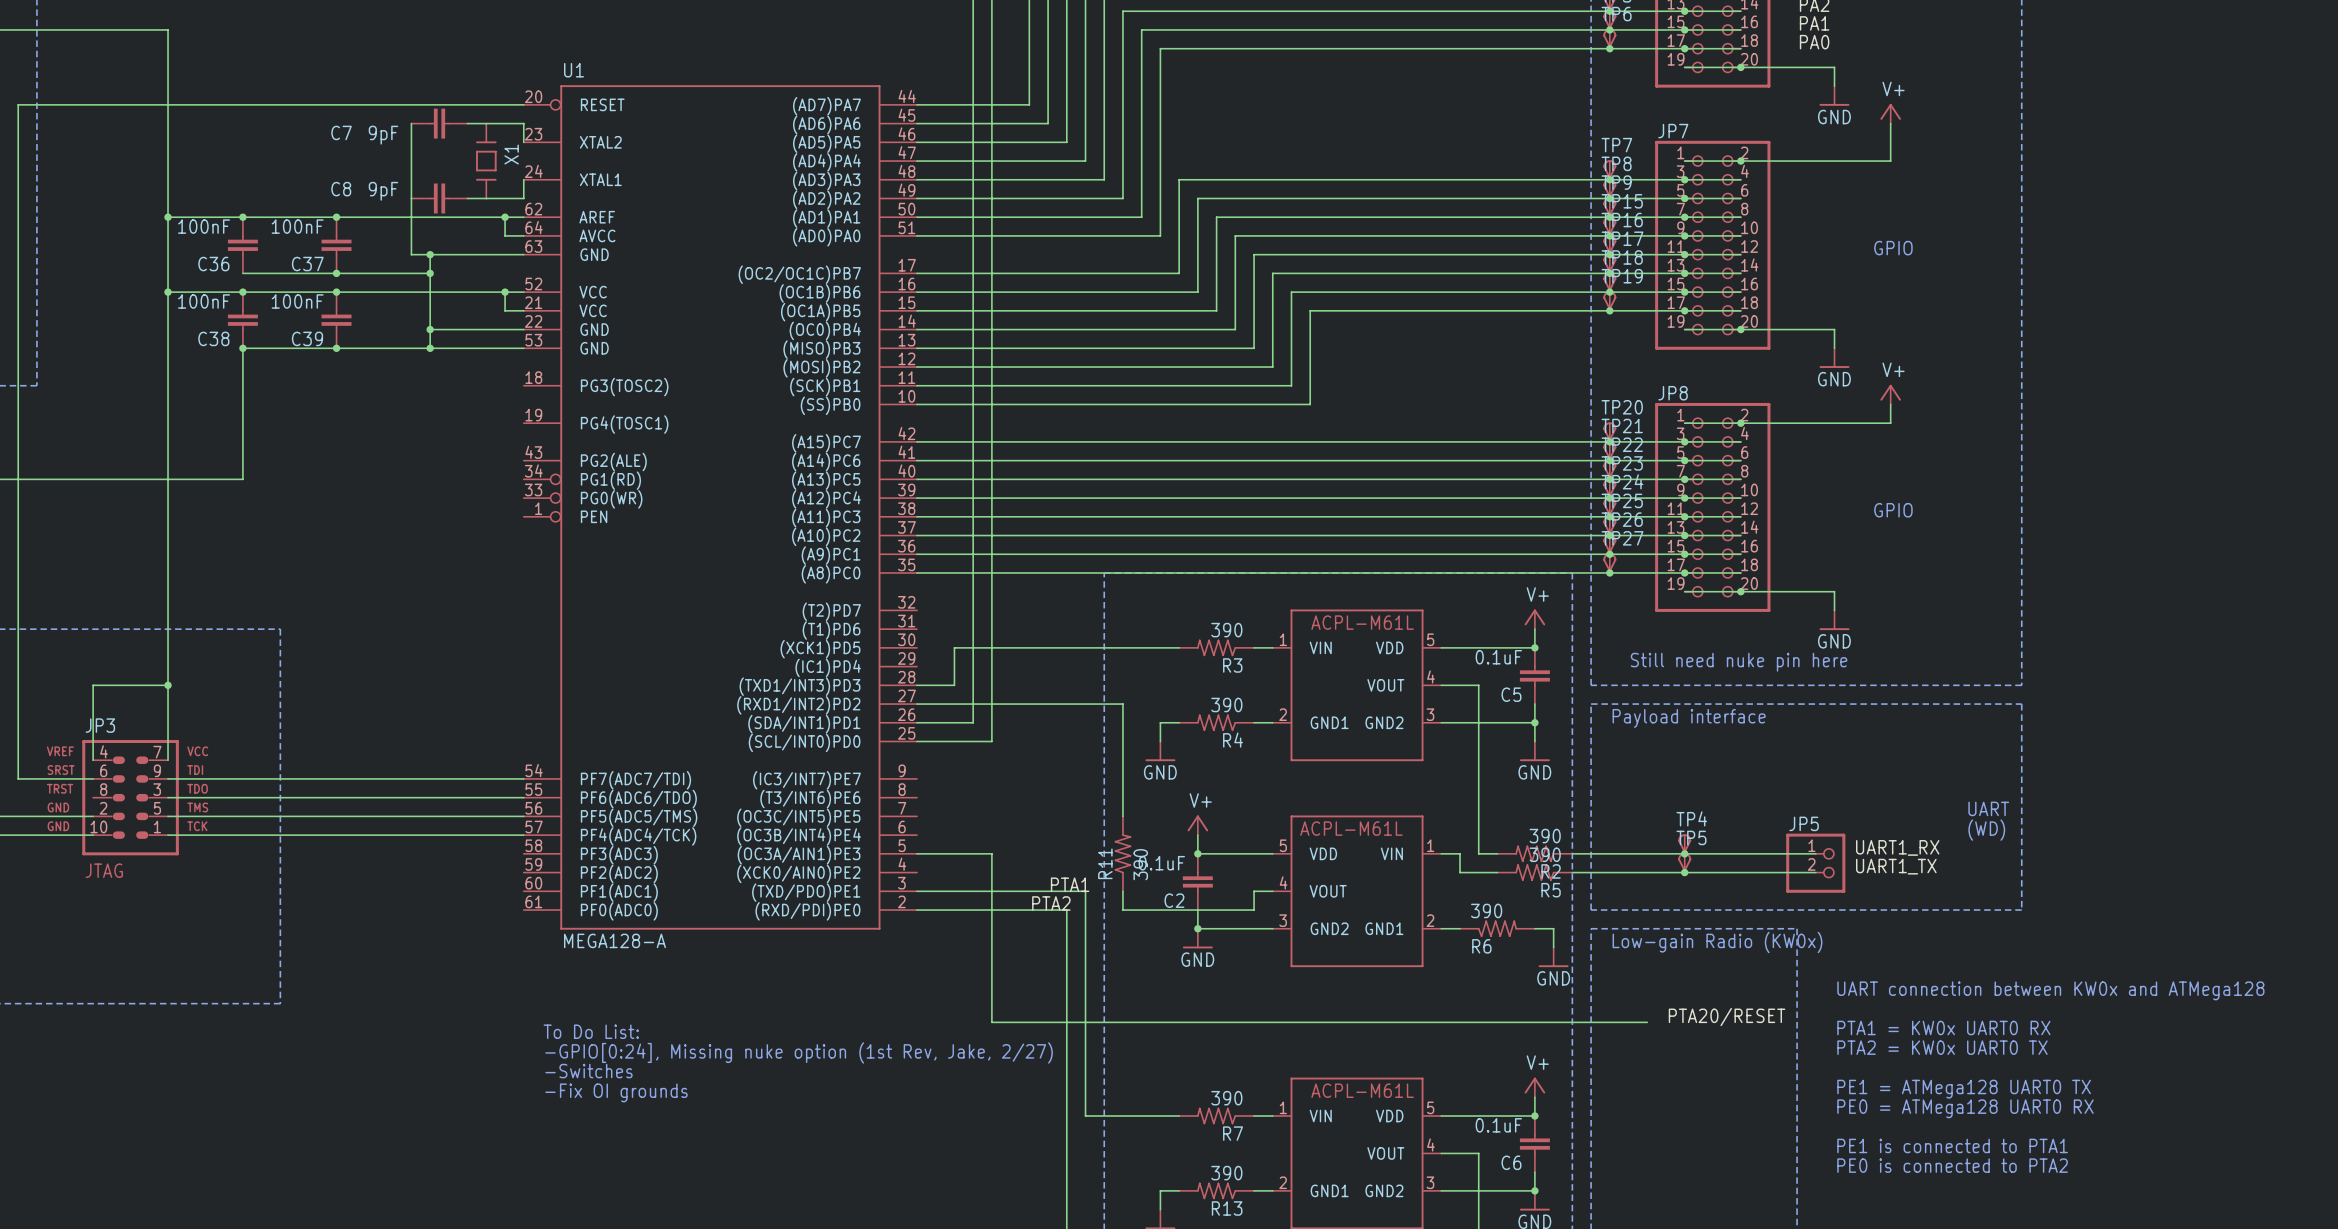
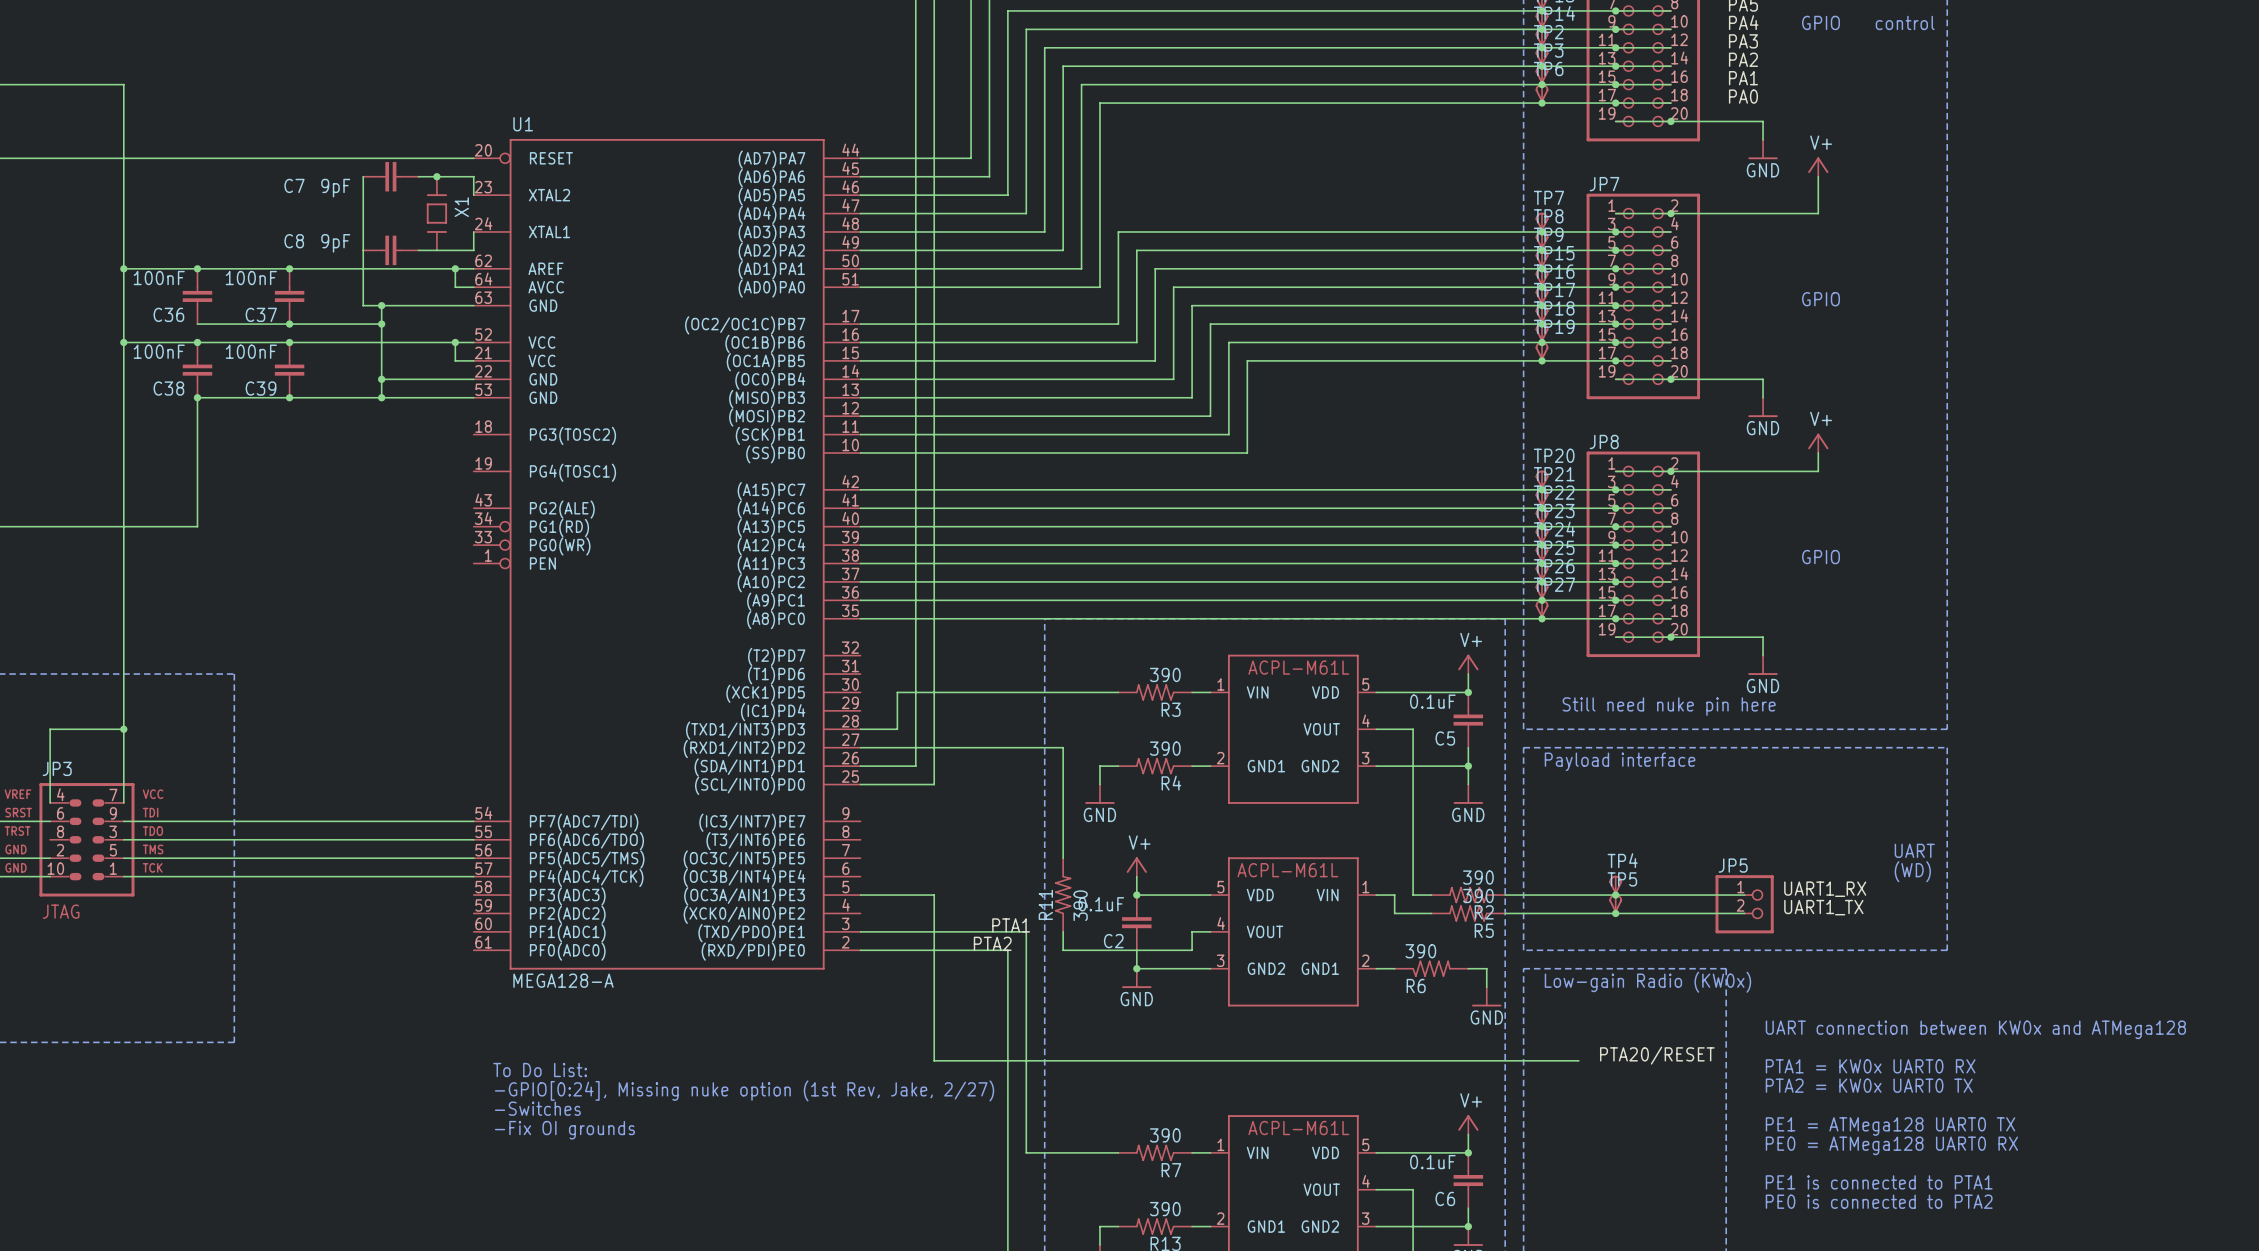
junction: none -> (436, 176)

